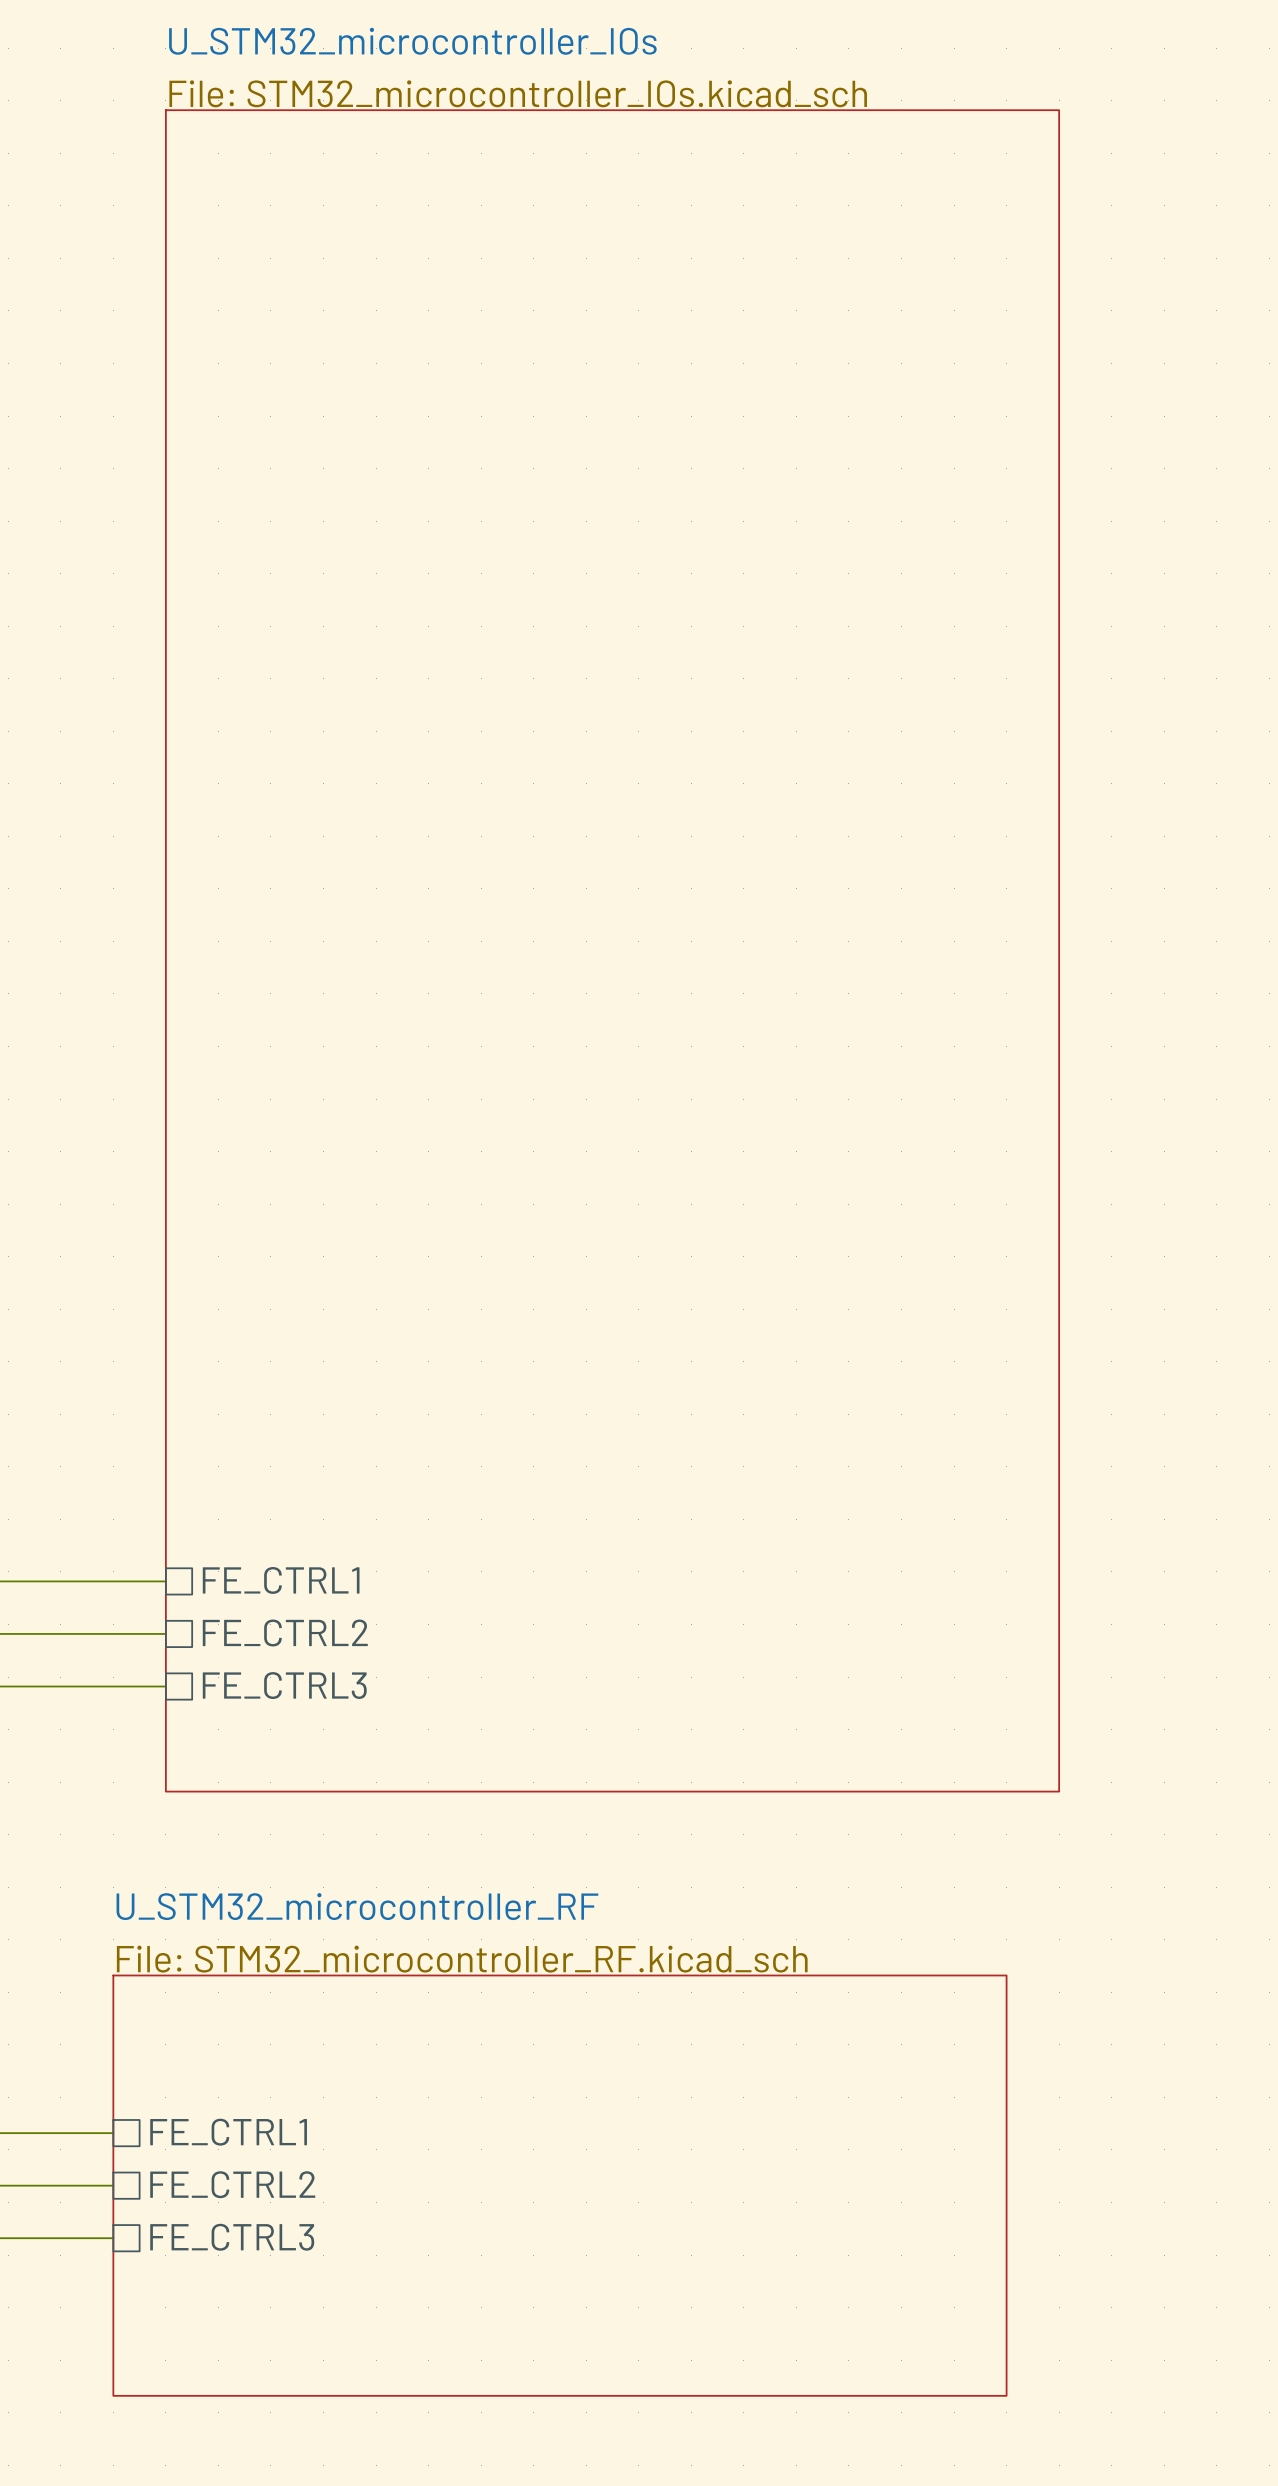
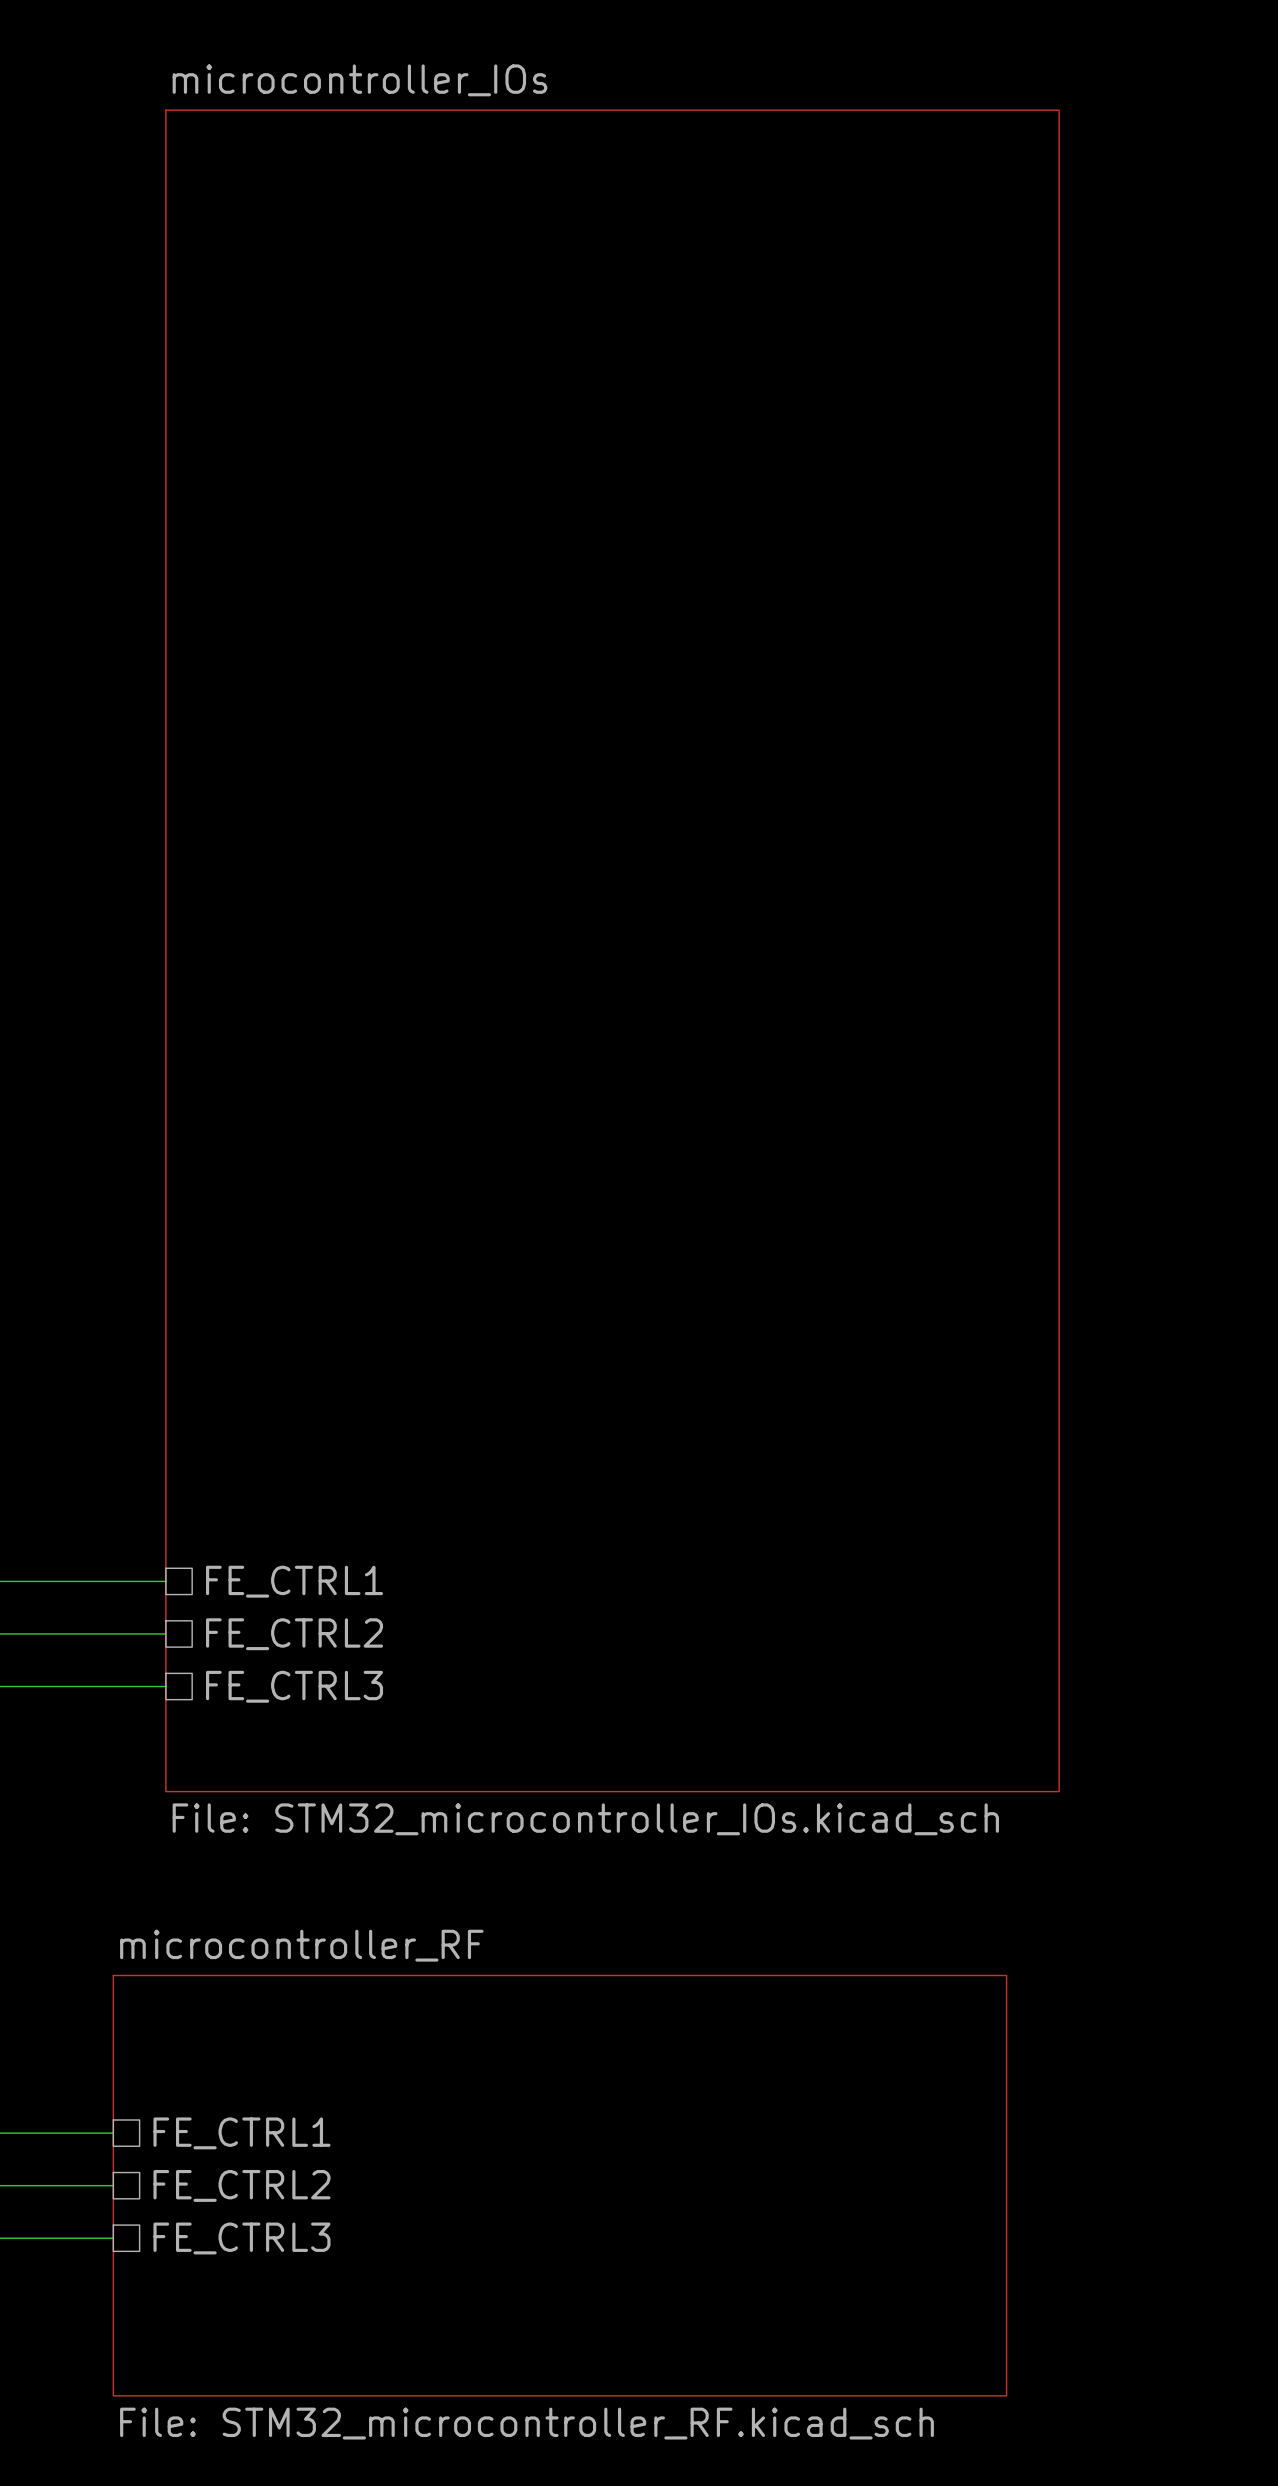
sheet U_STM32_microcontroller_IOs name: U_STM32_microcontroller_IOs (412, 41) -> microcontroller_IOs (359, 80)
sheet U_STM32_microcontroller_IOs value position: File: STM32_microcontroller_IOs.kicad_sch (518, 93) -> File: STM32_microcontroller_IOs.kicad_sch (585, 1819)
sheet U_STM32_microcontroller_RF name: U_STM32_microcontroller_RF (357, 1906) -> microcontroller_RF (301, 1945)
sheet U_STM32_microcontroller_RF value position: File: STM32_microcontroller_RF.kicad_sch (462, 1959) -> File: STM32_microcontroller_RF.kicad_sch (527, 2423)

